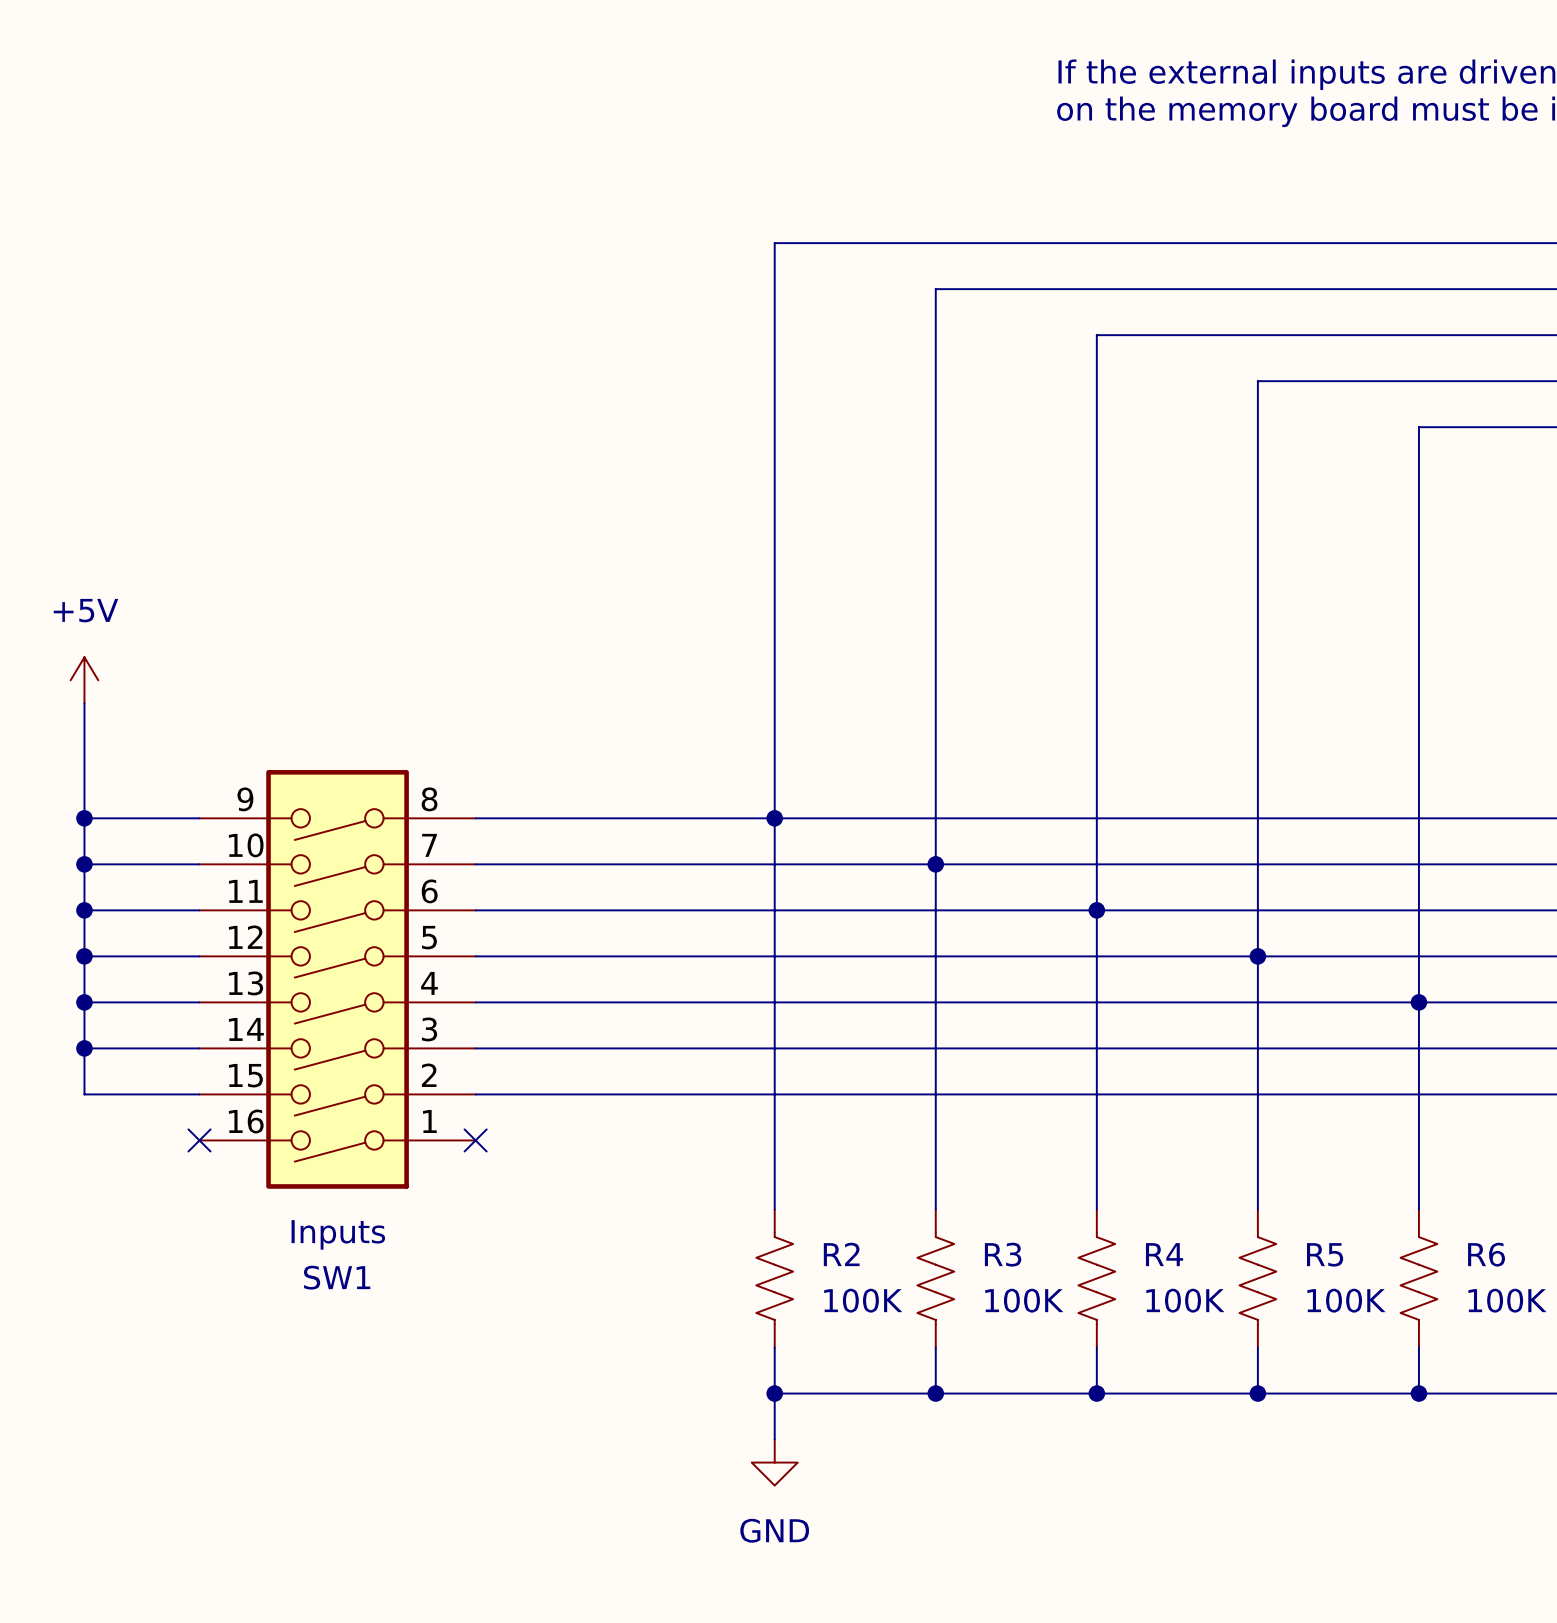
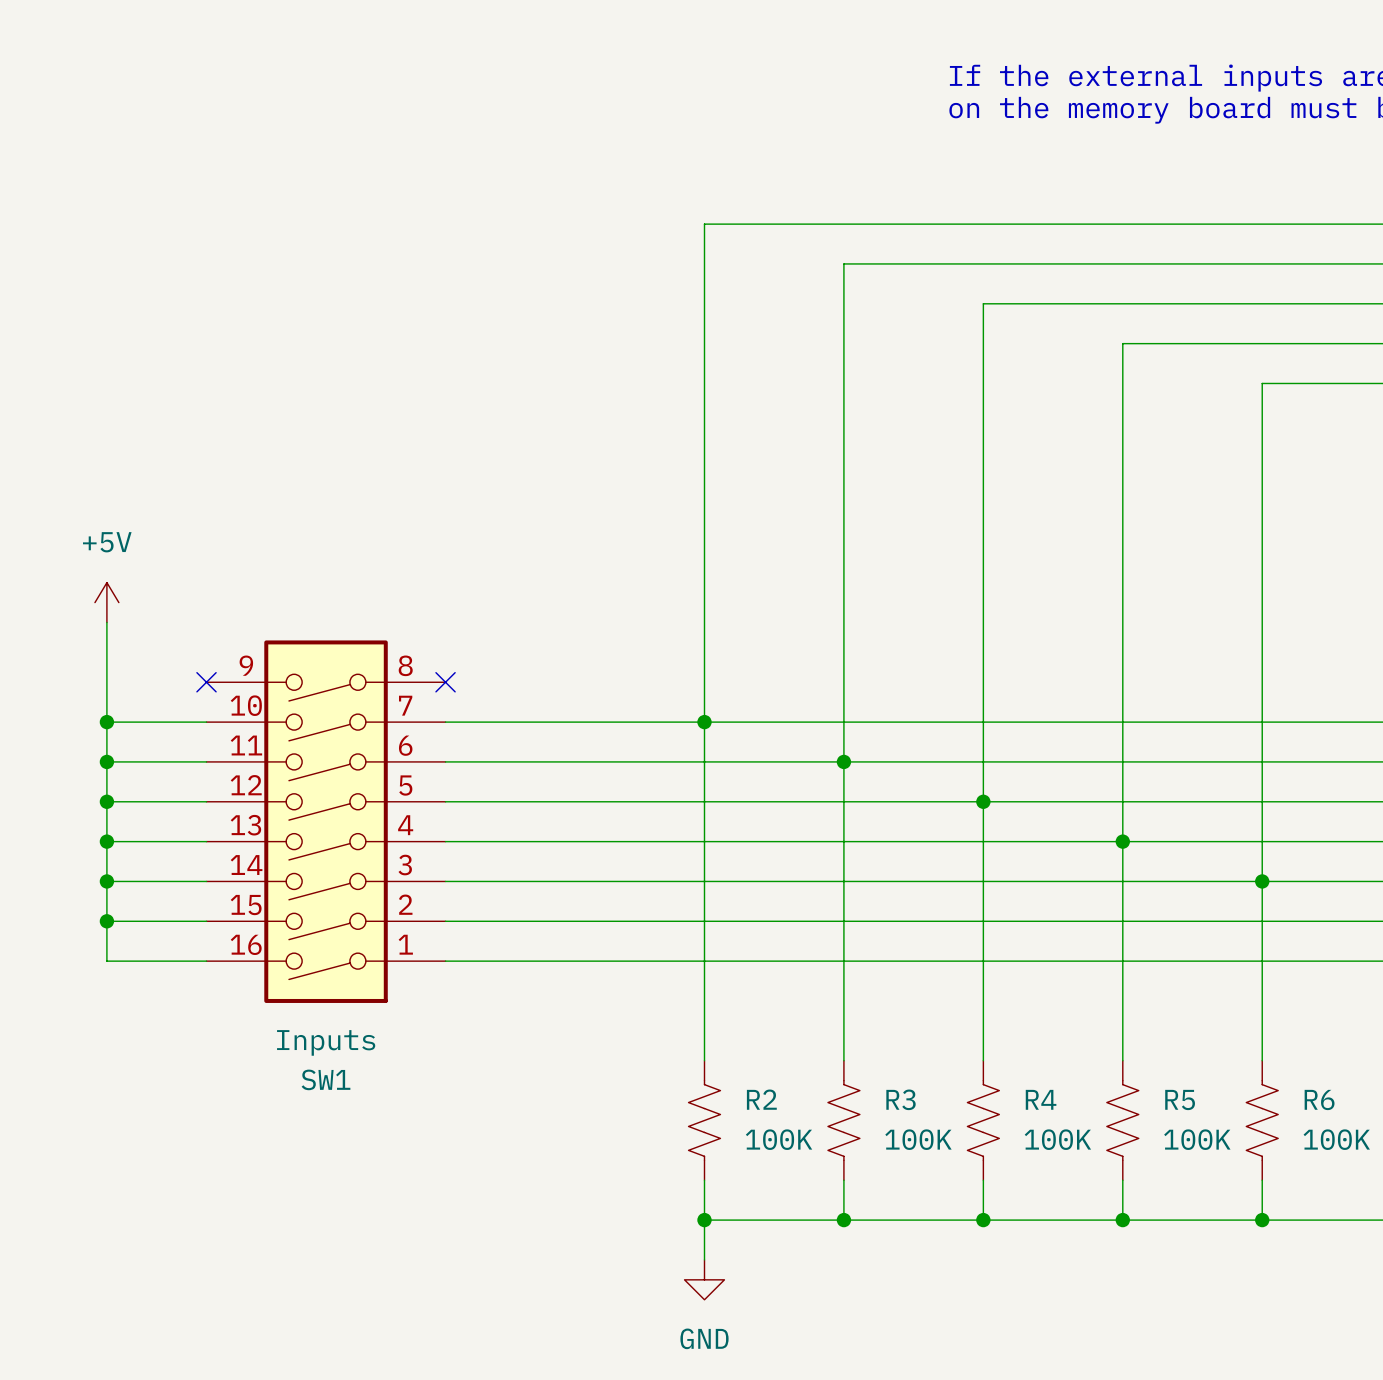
no-connect mark: none -> (206, 682)
no-connect mark: none -> (445, 682)
SW1 position: (337, 979) -> (326, 821)
no-connect mark: (199, 1140) -> none
no-connect mark: (475, 1140) -> none

